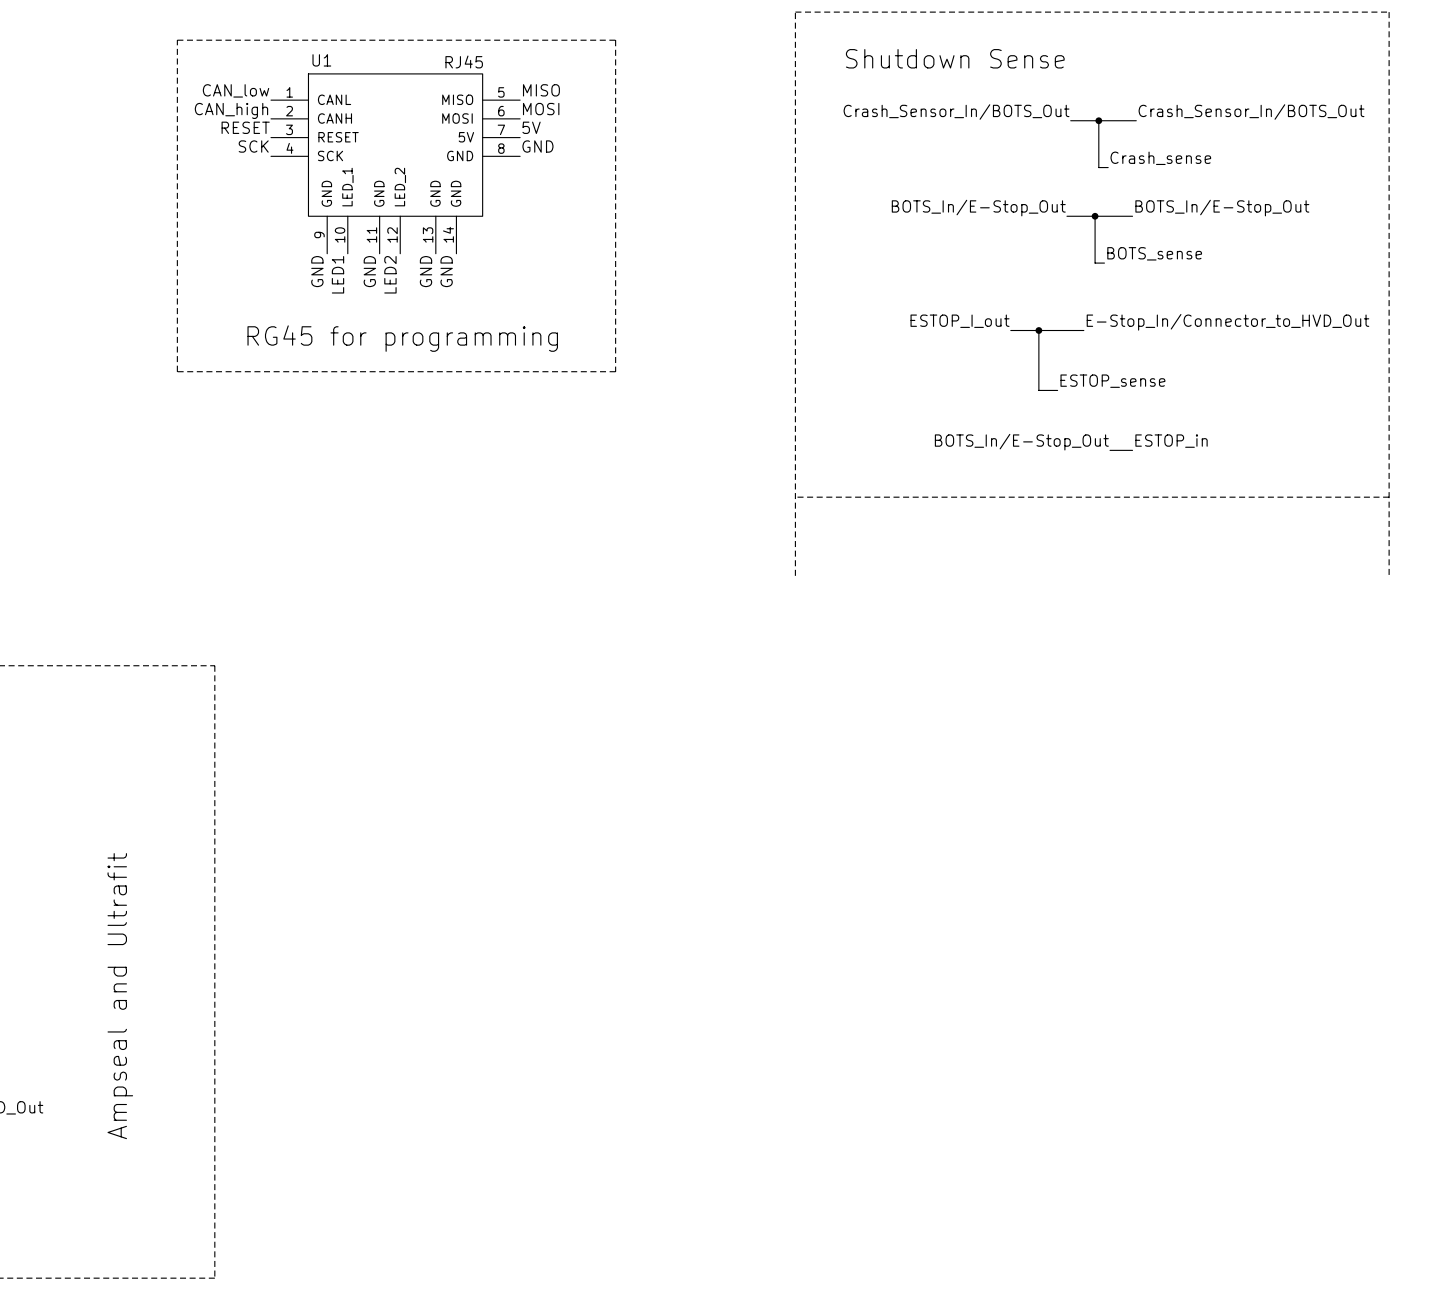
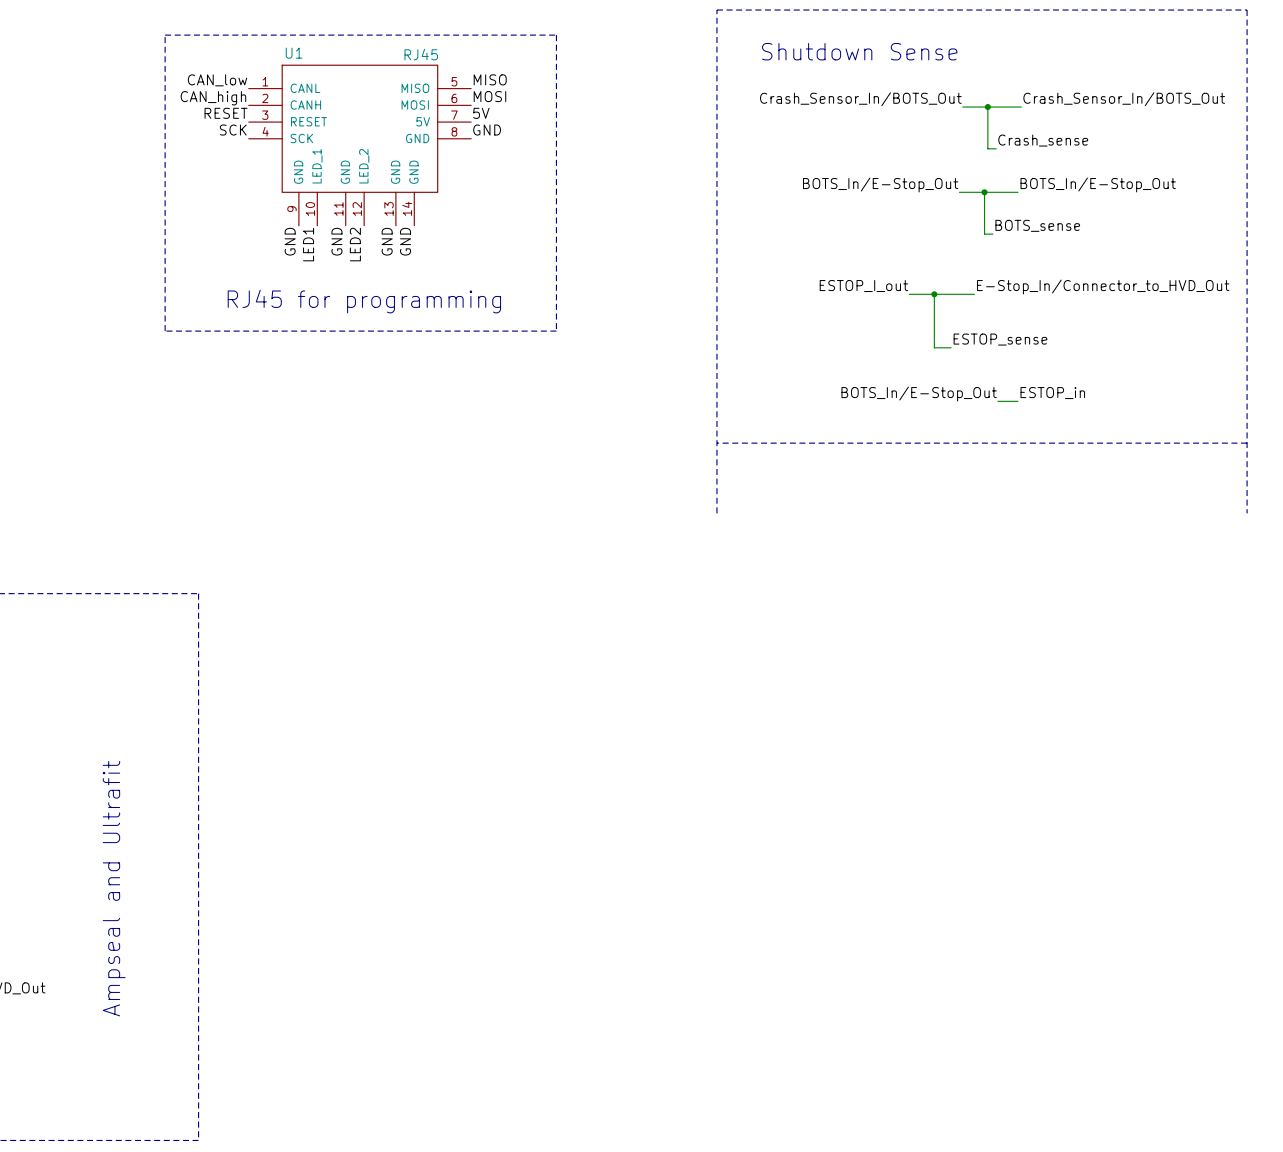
text: RG45 for programming (402, 338) -> RJ45 for programming (364, 301)

